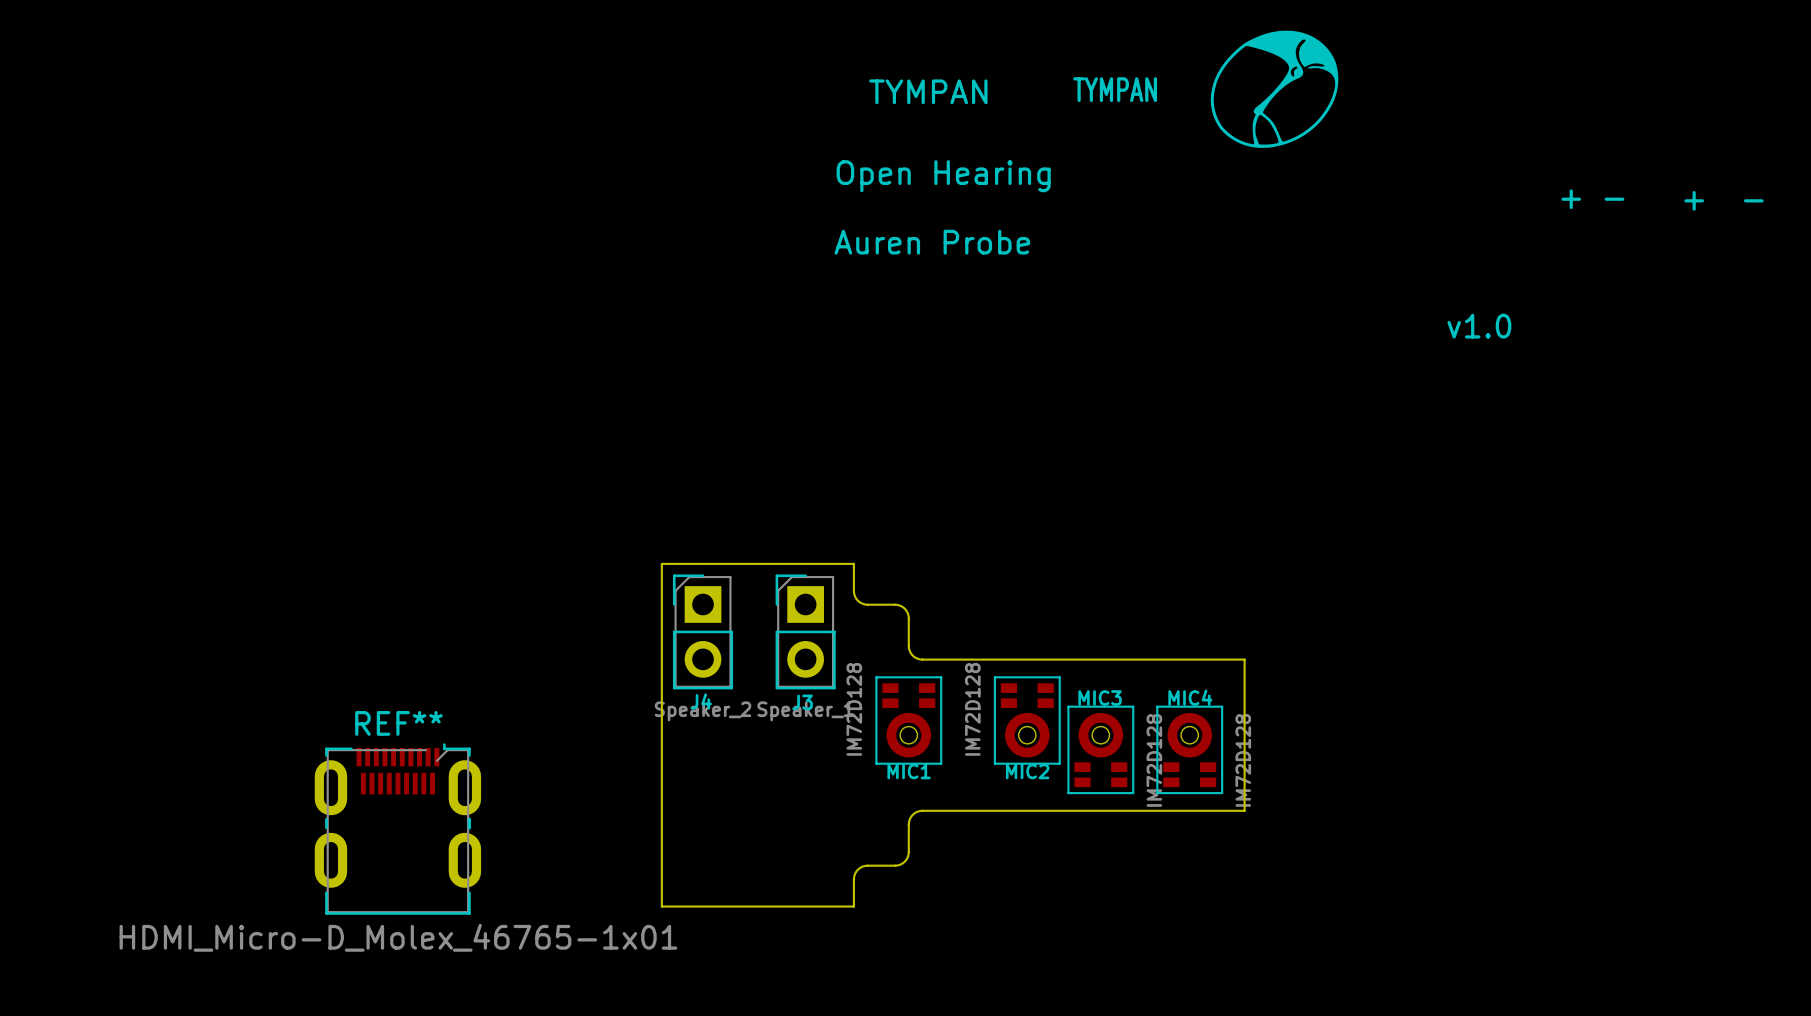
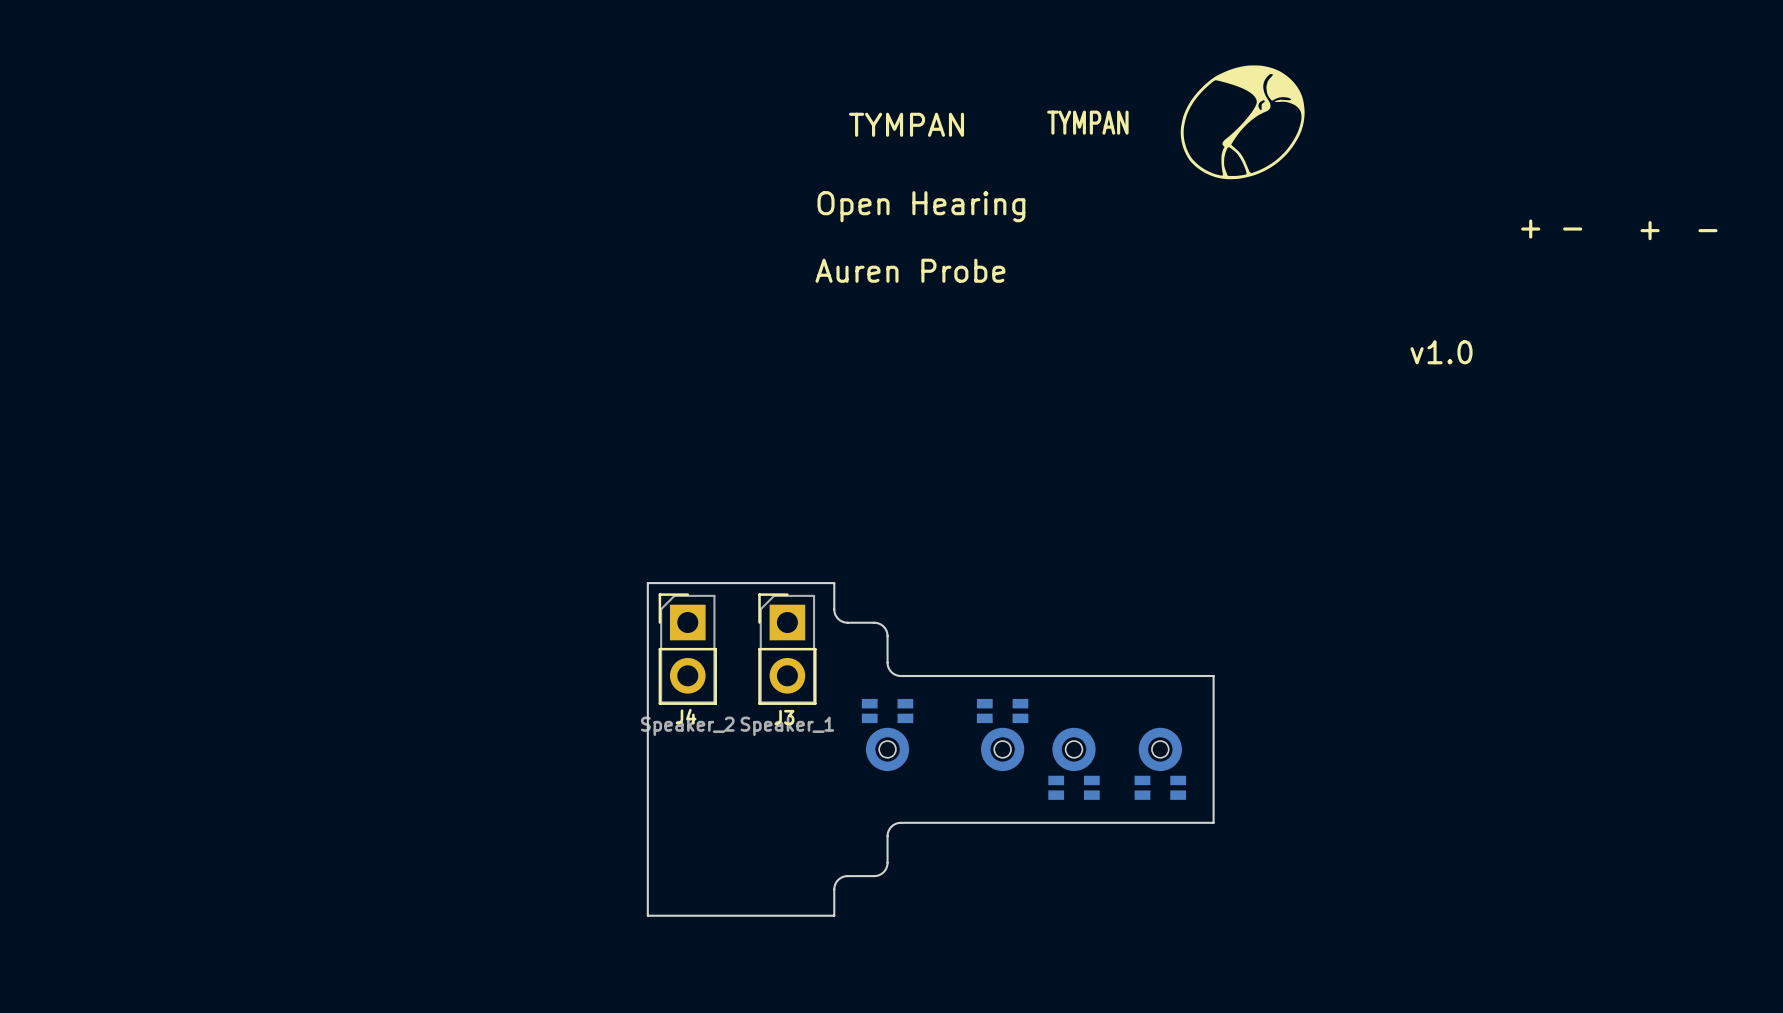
MIC1 side: top (908, 720) -> bottom (887, 734)
MIC2 side: top (1027, 720) -> bottom (1002, 734)
MIC3 side: top (1100, 749) -> bottom (1074, 763)
MIC4 side: top (1189, 749) -> bottom (1160, 763)
REF**: HDMI_Micro-D_Molex_46765-1x01 (397, 828) -> none

